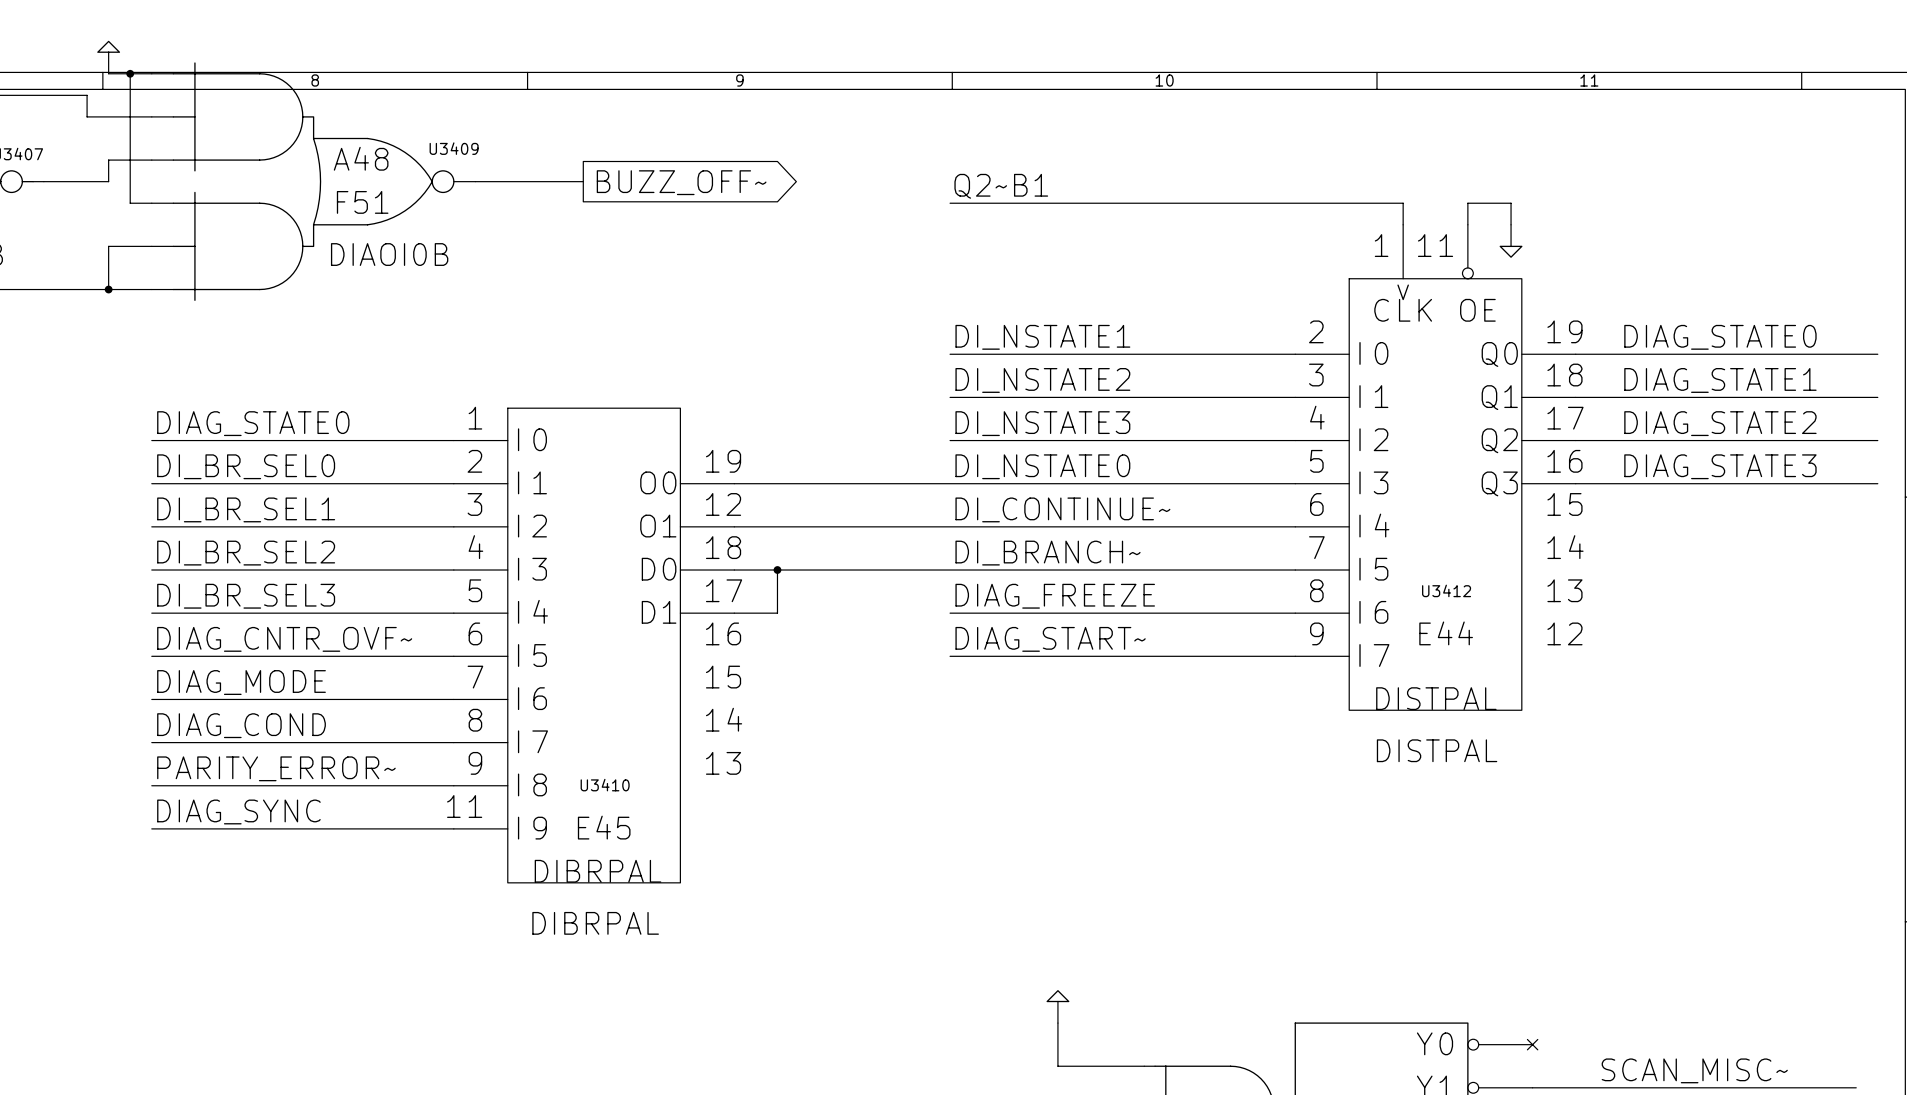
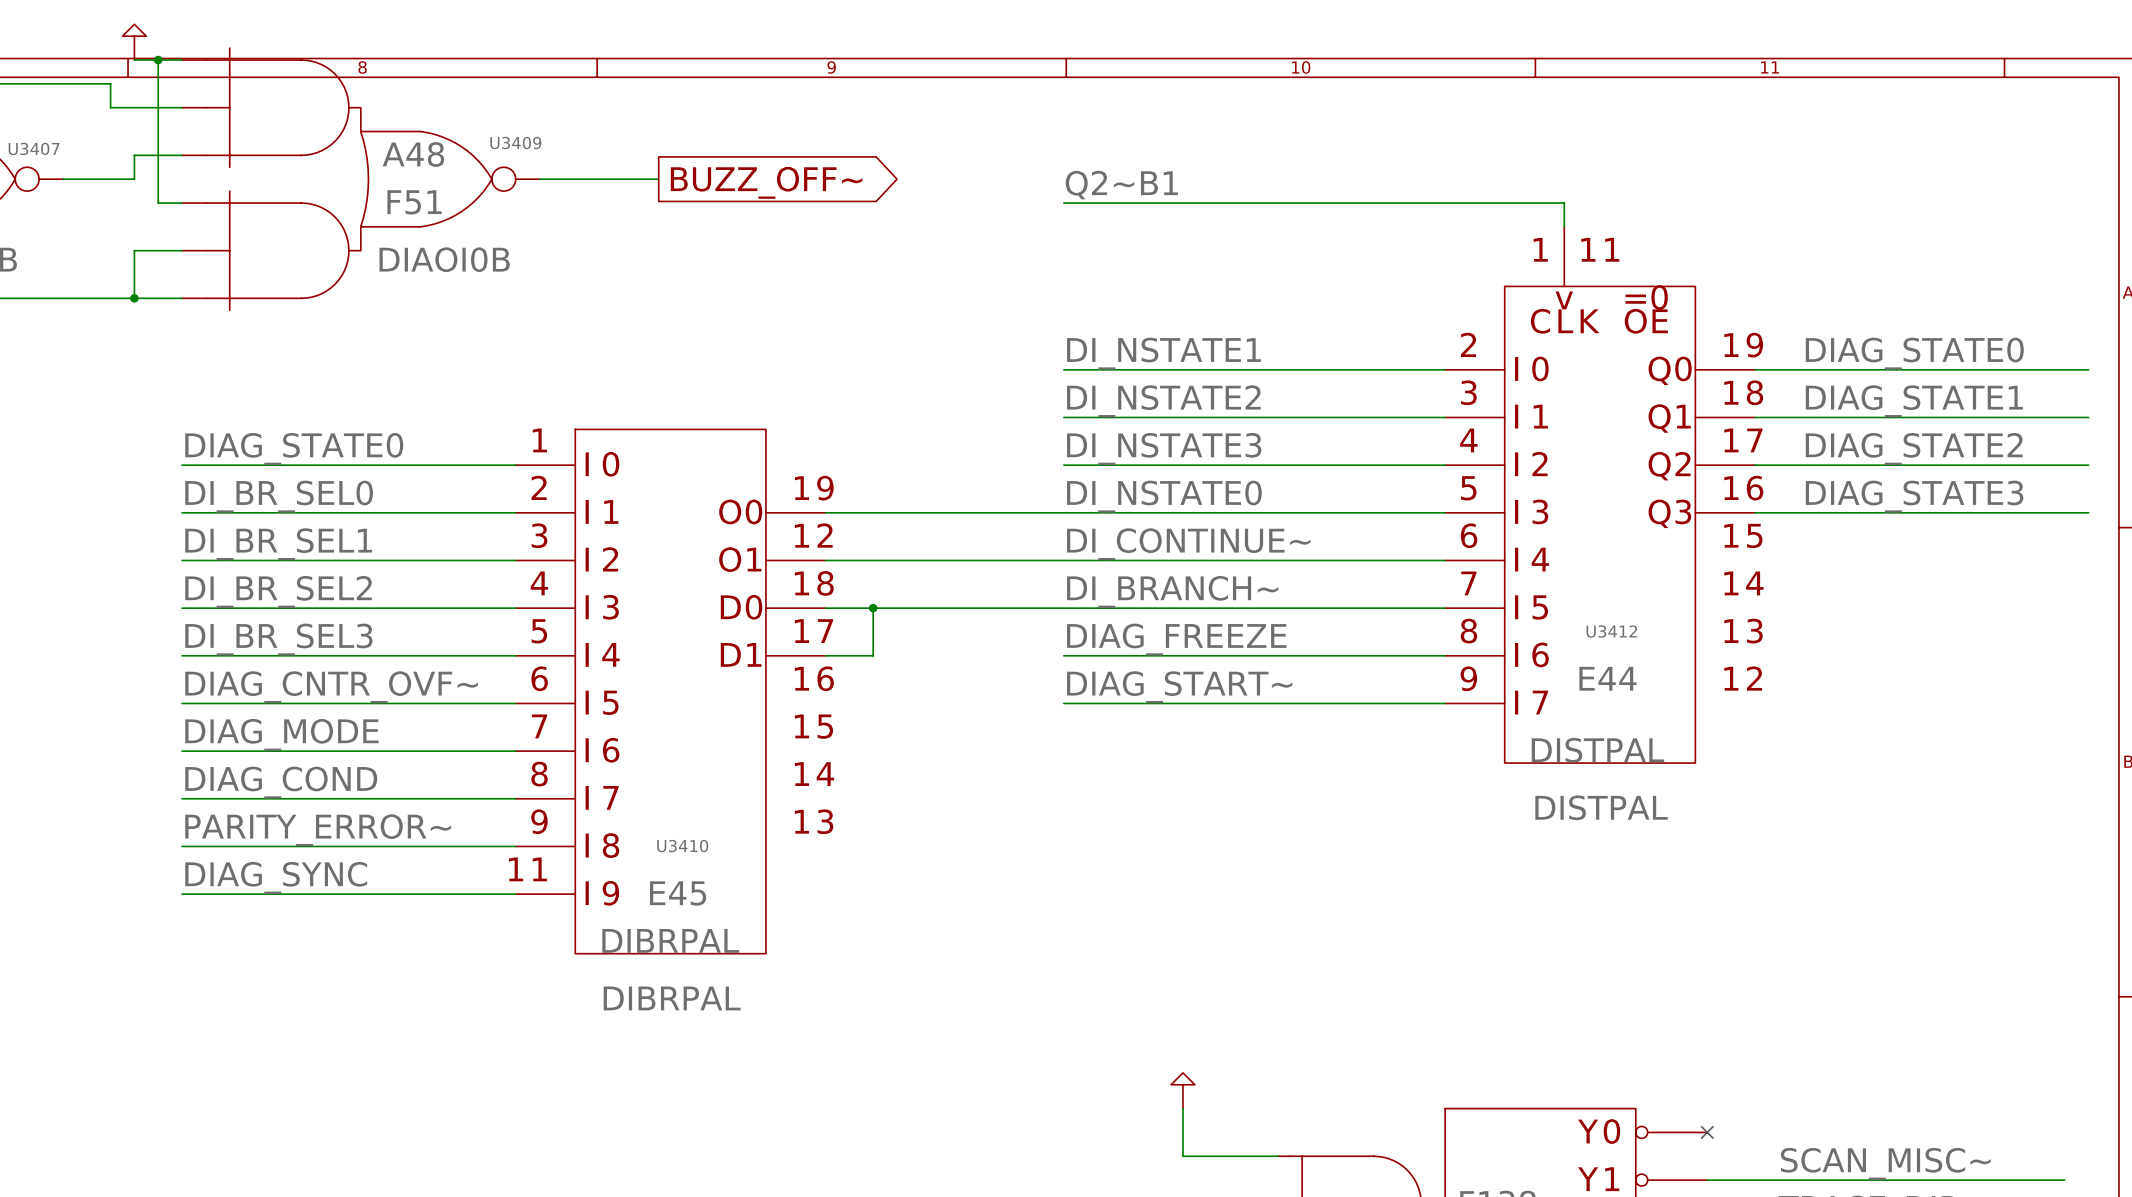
U3412 symbol: [1295, 224, 1576, 711] -> [1445, 226, 1755, 764]
wire: (1467, 224) (1467, 203) (1511, 203) (1511, 224) -> none
power symbol: (1511, 241) -> none

